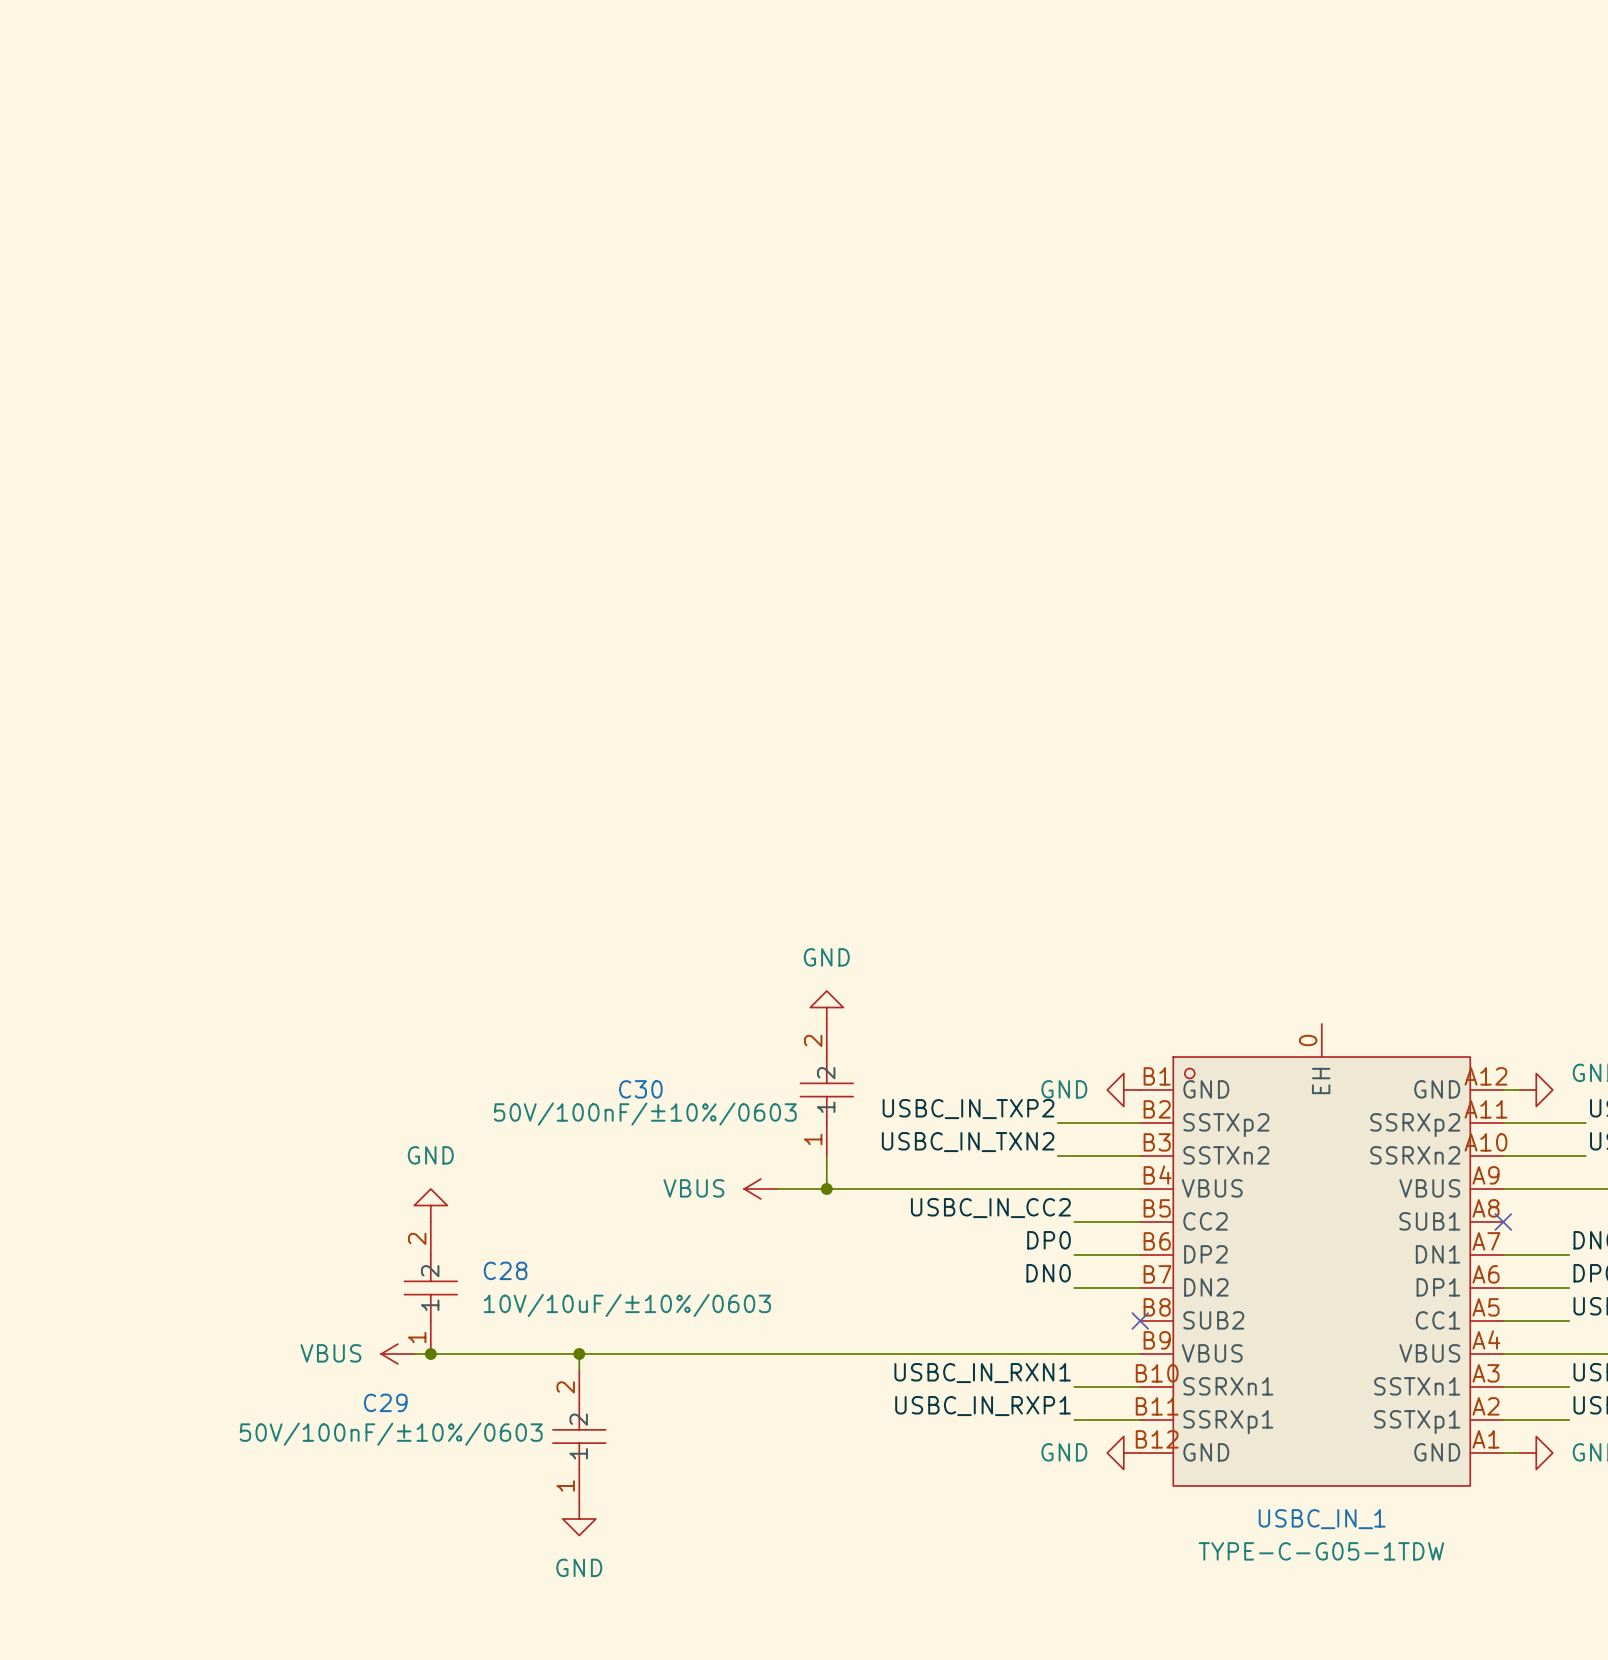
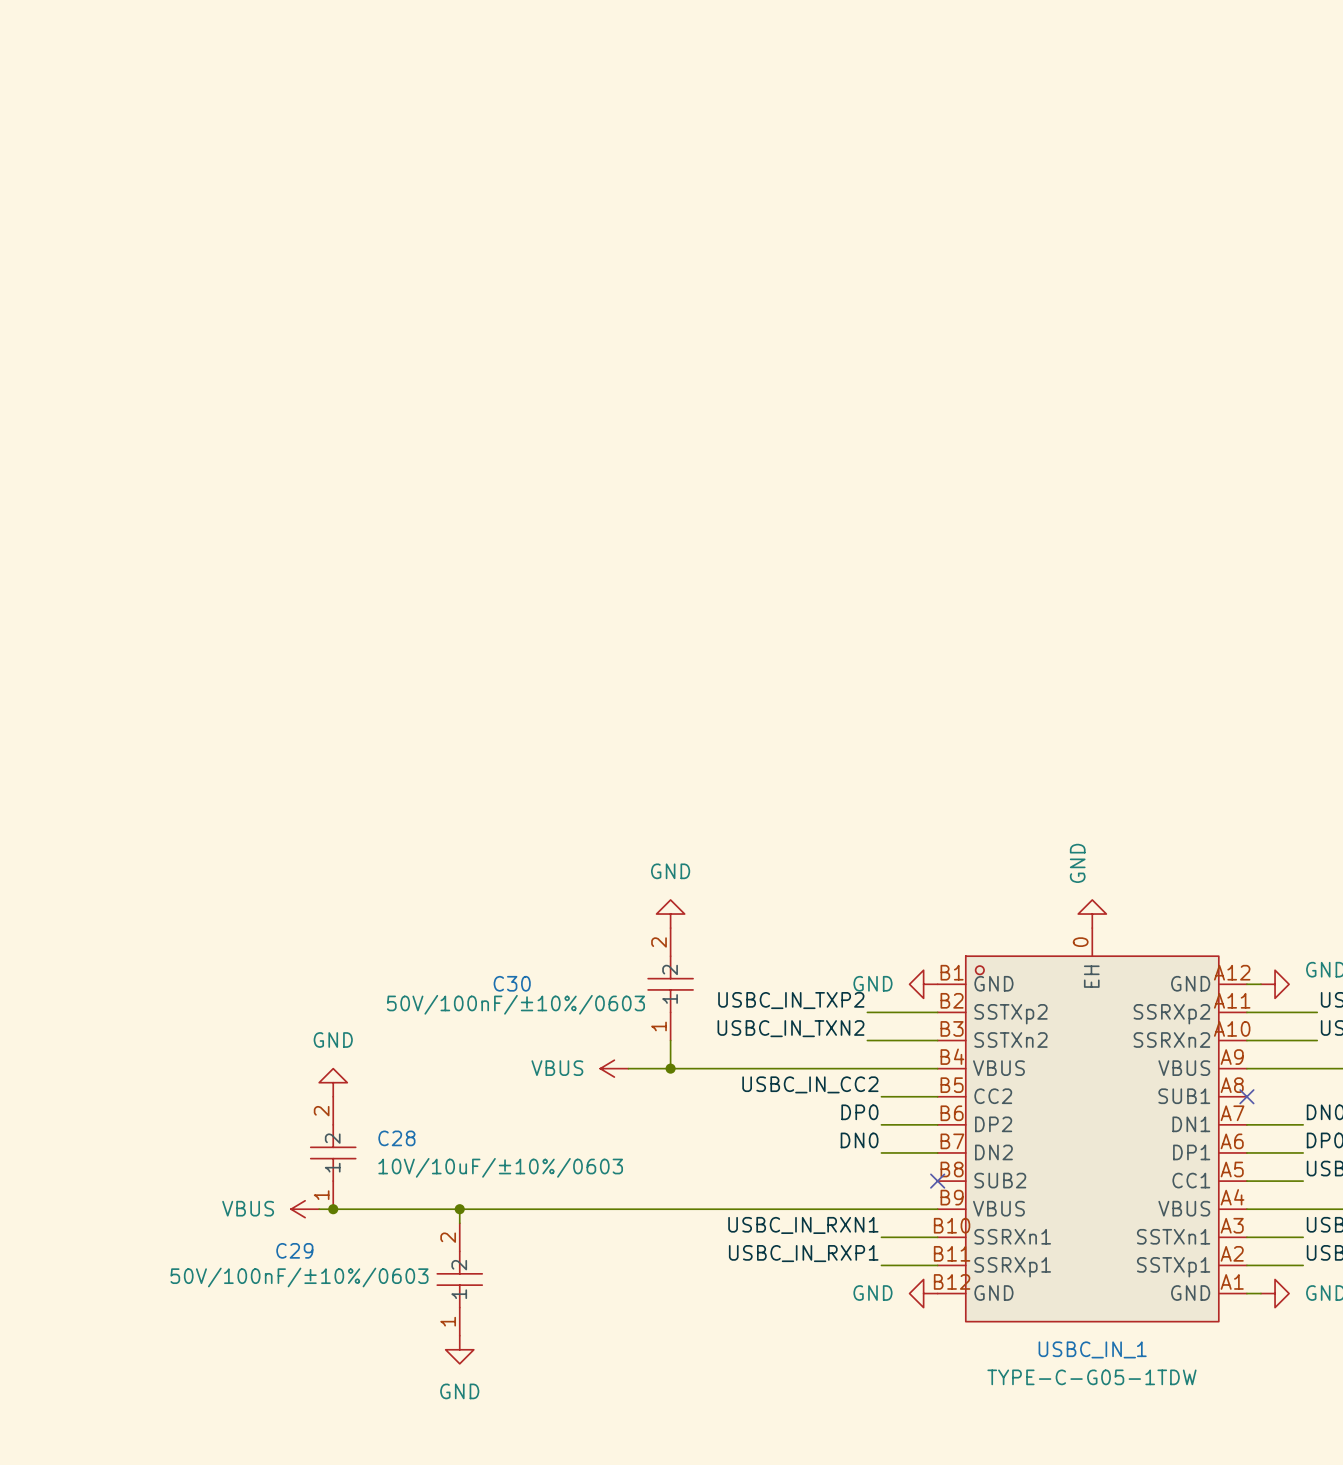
power symbol: none -> GND (1092, 914)

